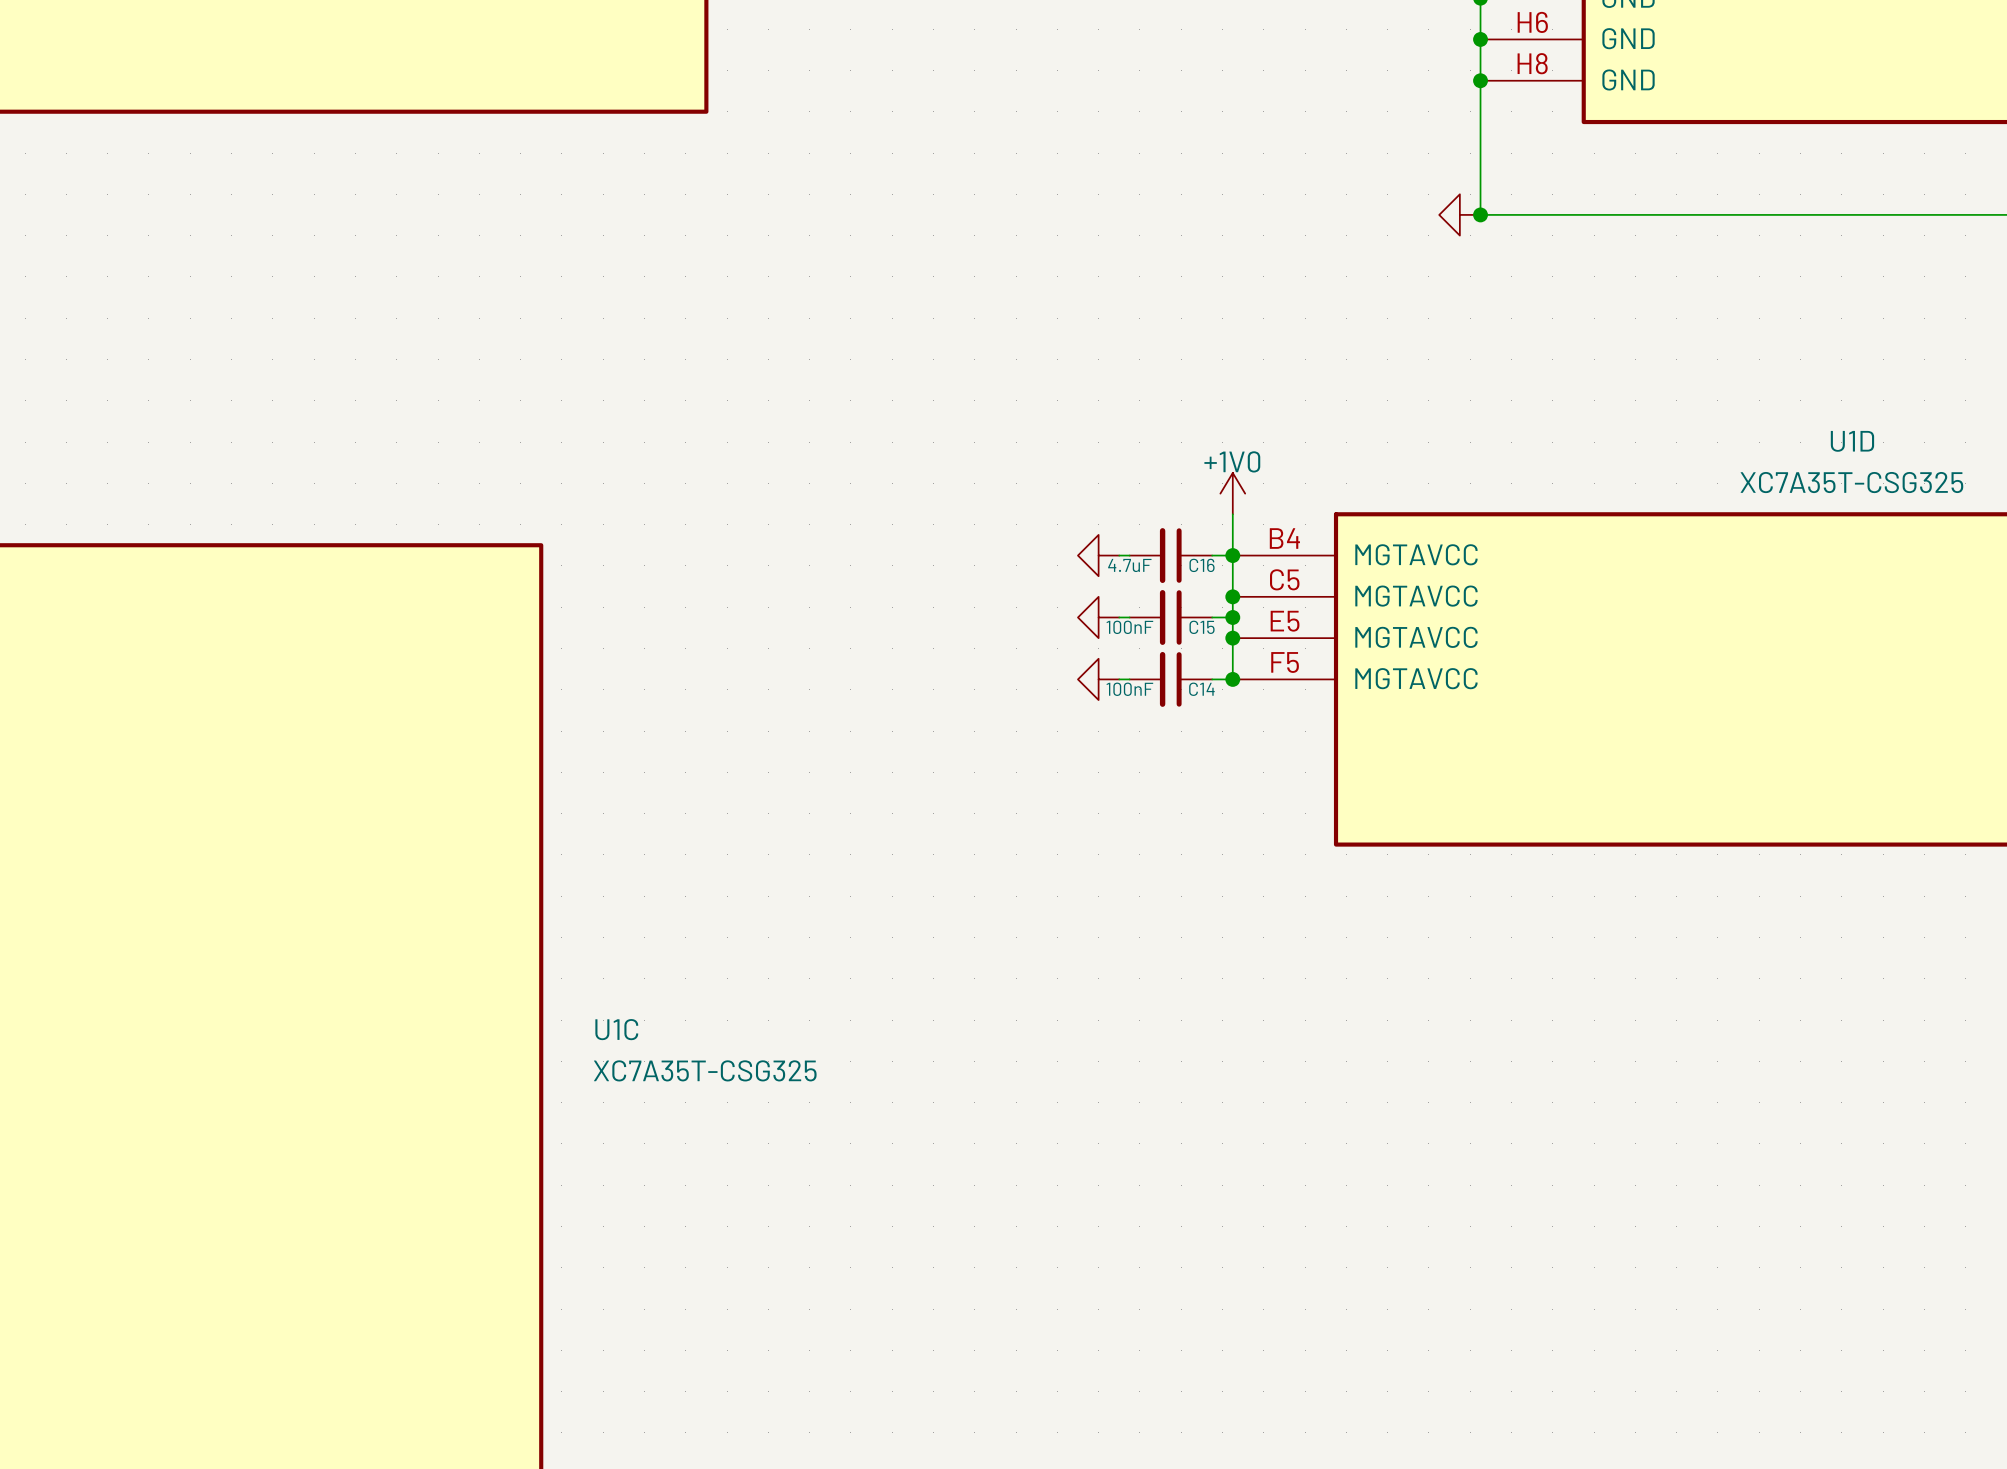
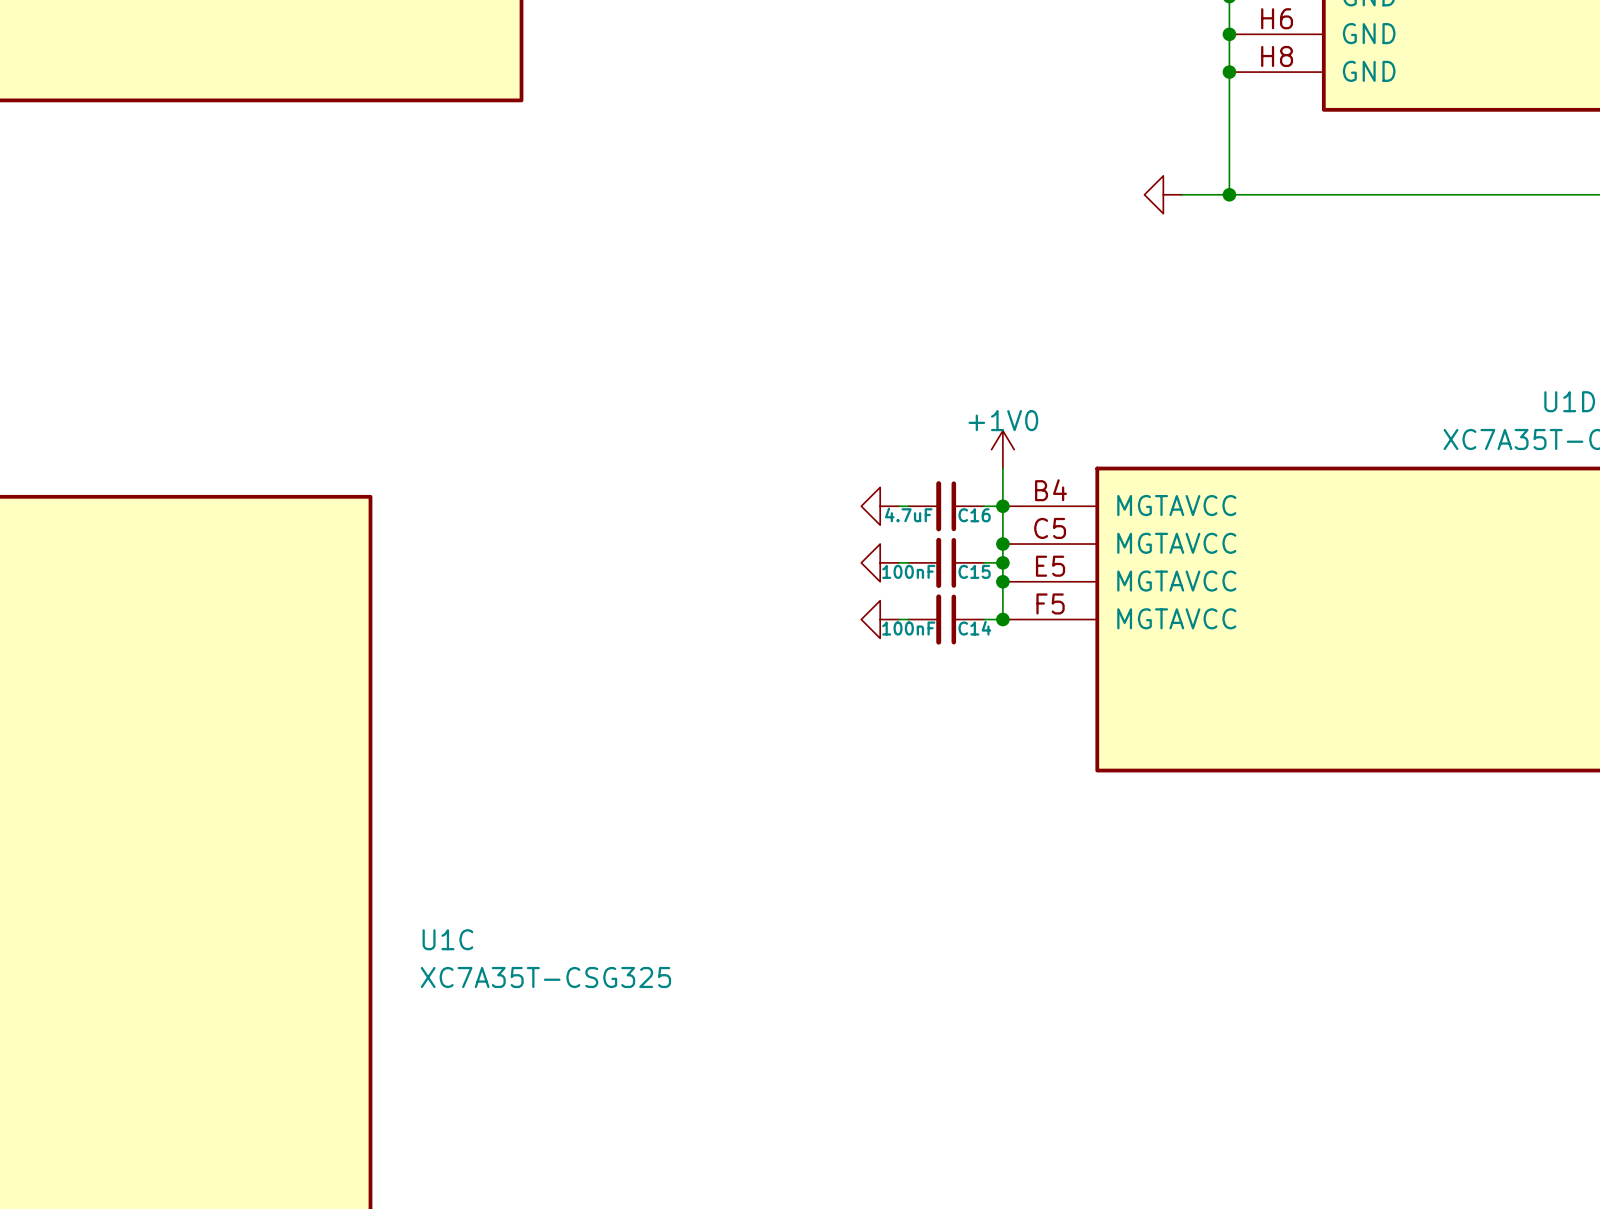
wire: none -> (1182, 194) (1229, 194)
power symbol position: (1459, 214) -> (1163, 194)

